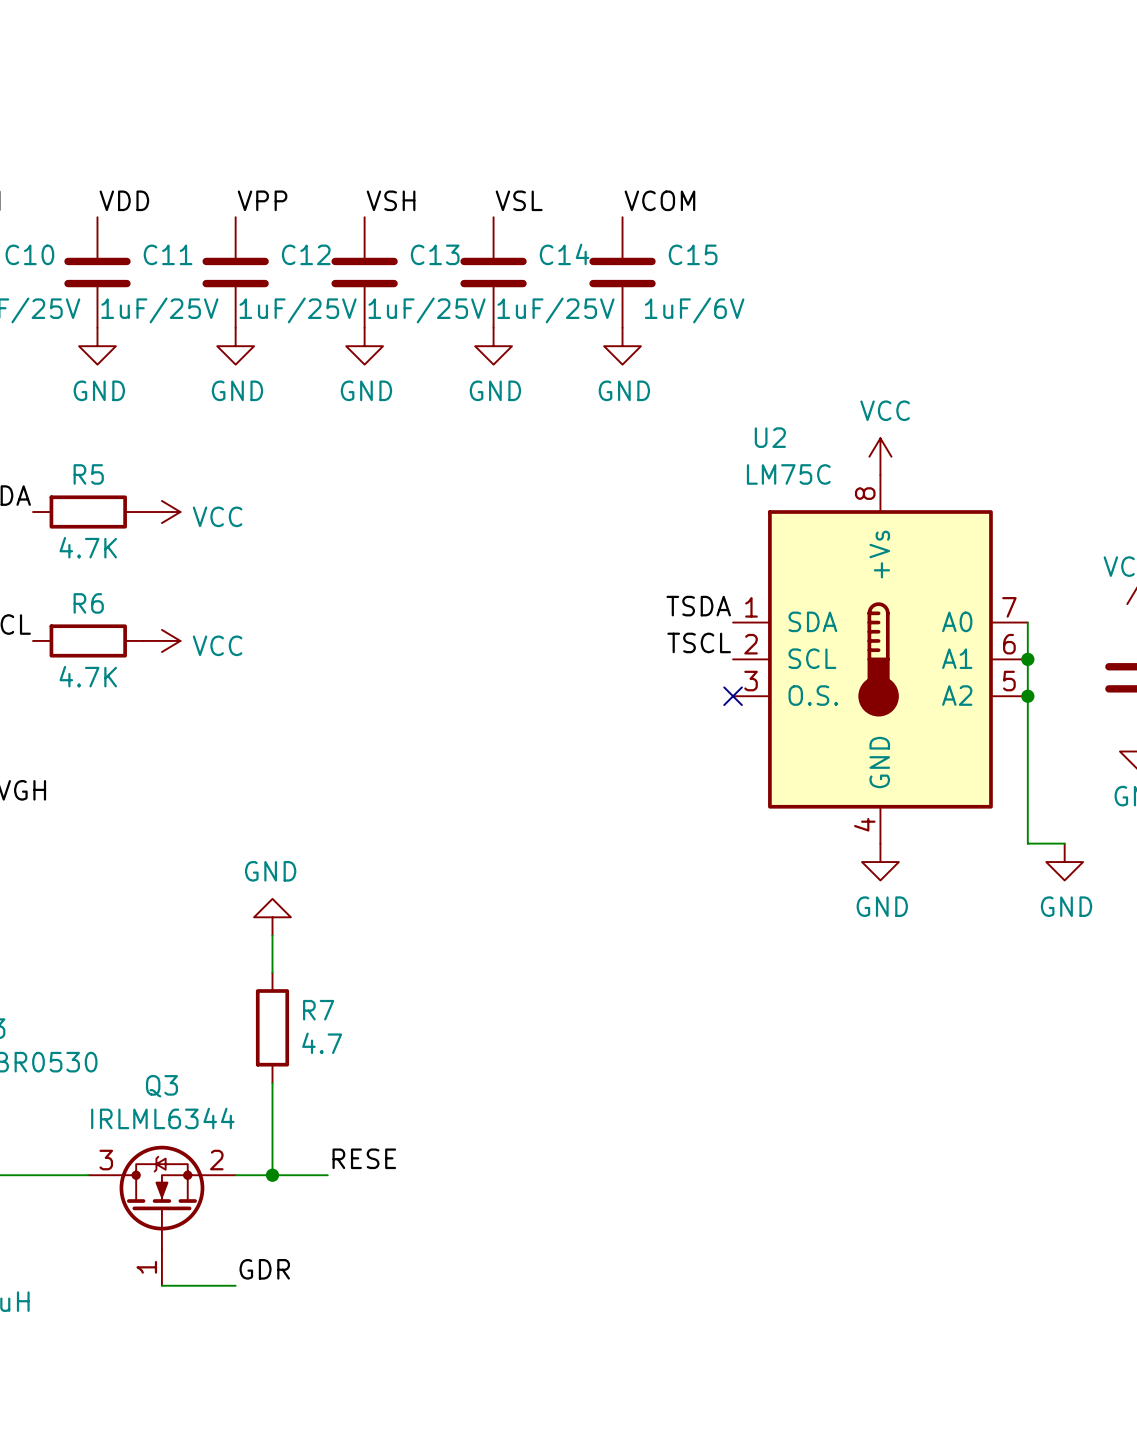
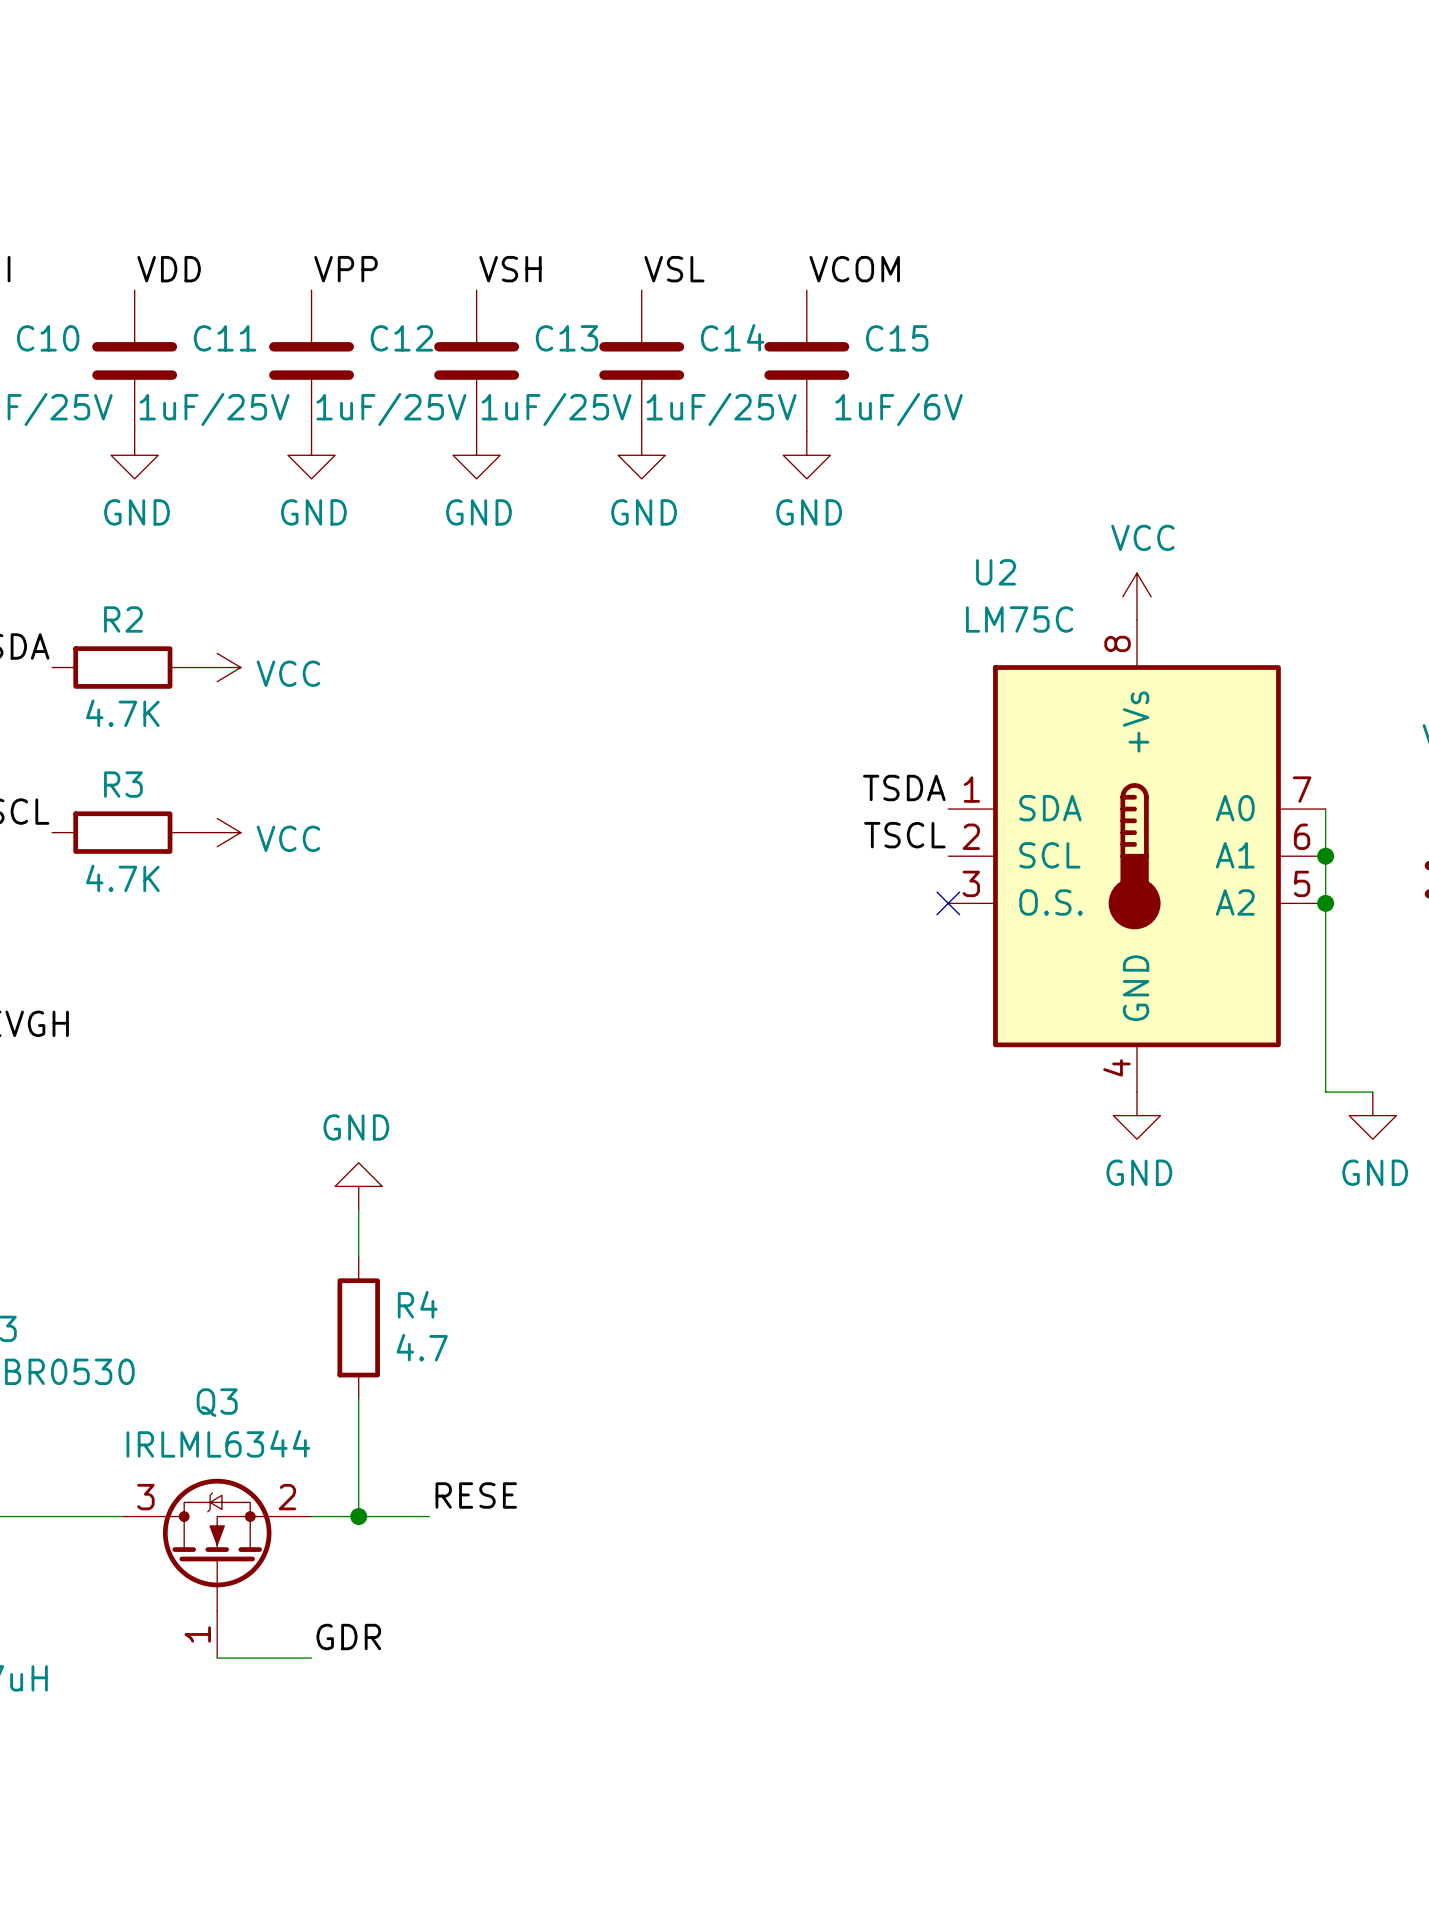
R5 name: R5 (88, 474) -> R2 (123, 619)
R6 name: R6 (88, 603) -> R3 (123, 784)
R7 name: R7 (318, 1010) -> R4 (417, 1304)

